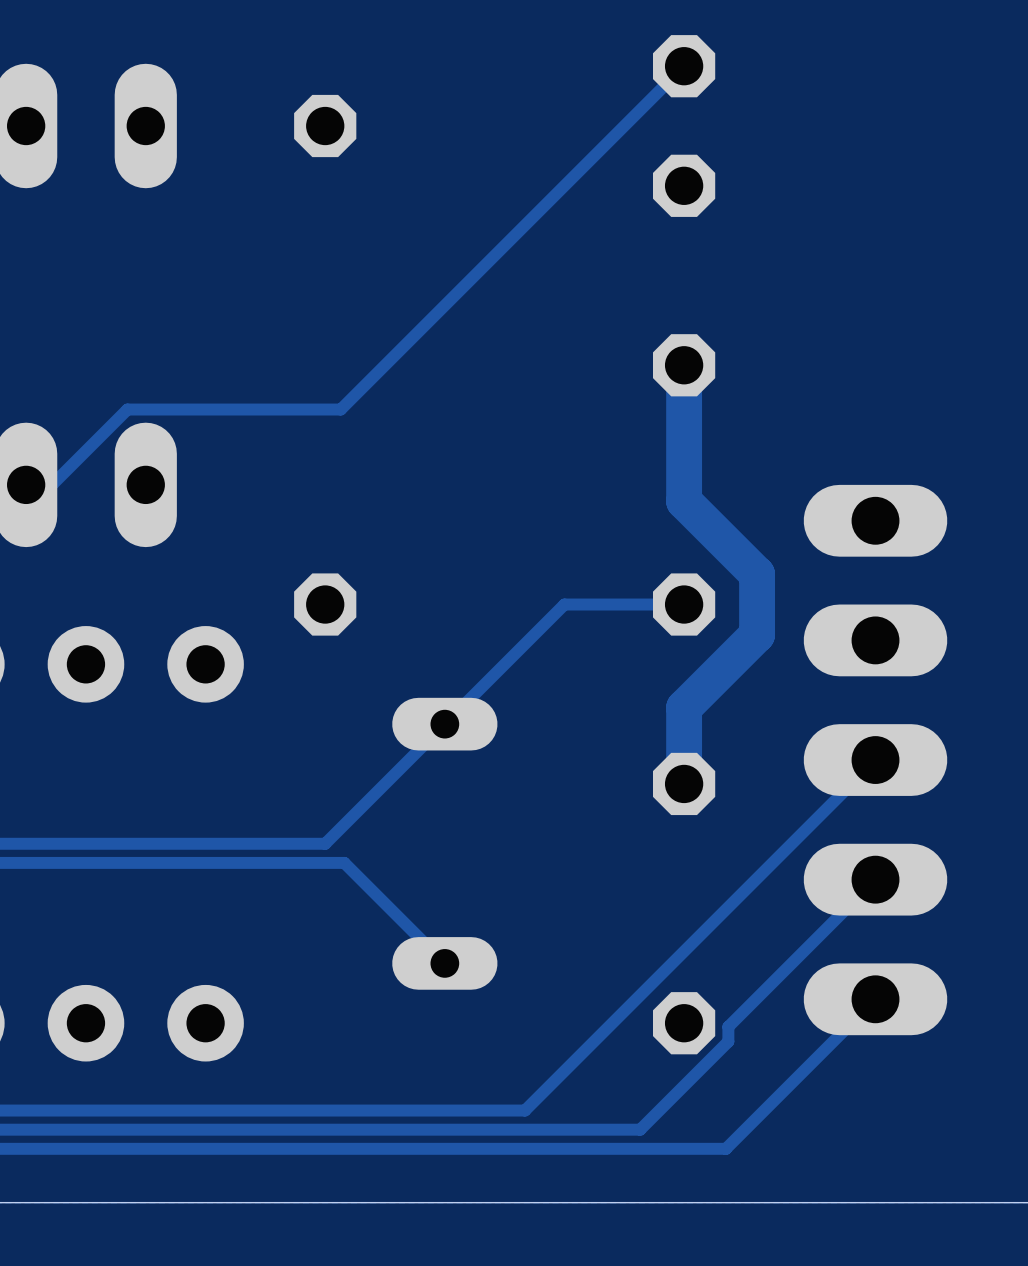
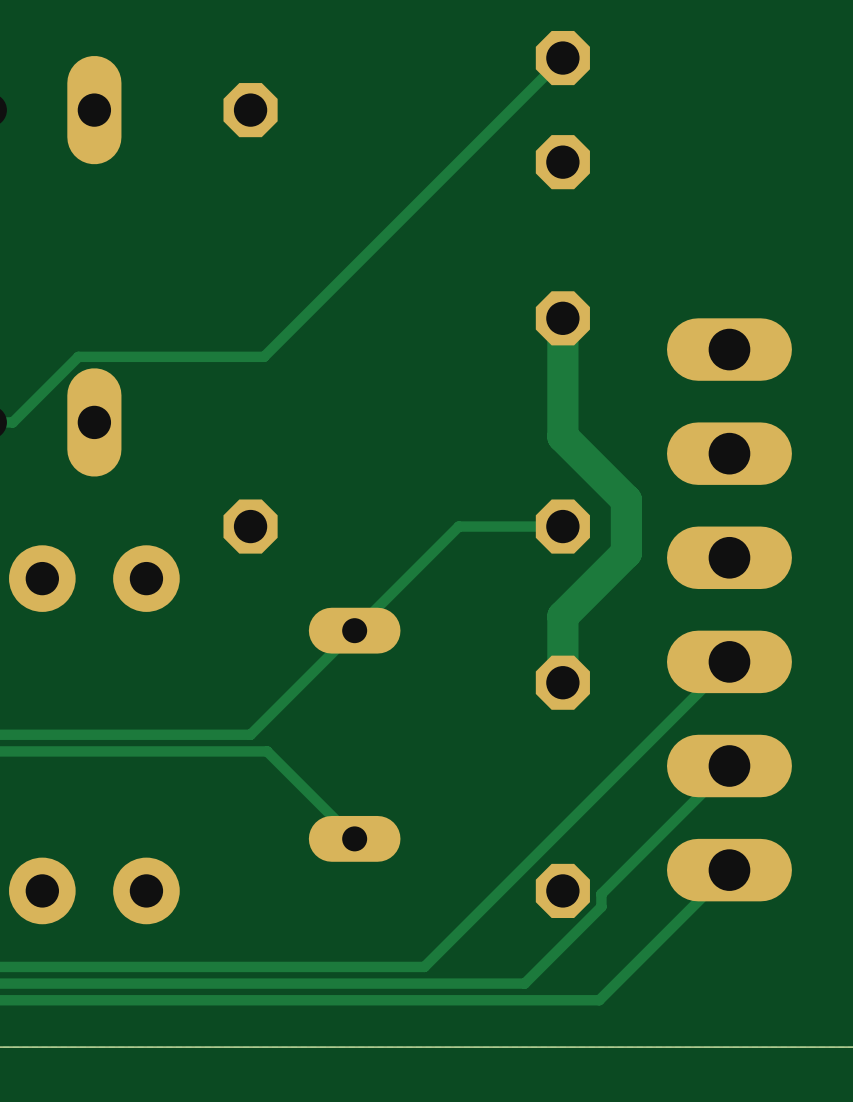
part: none -> (729, 609)

